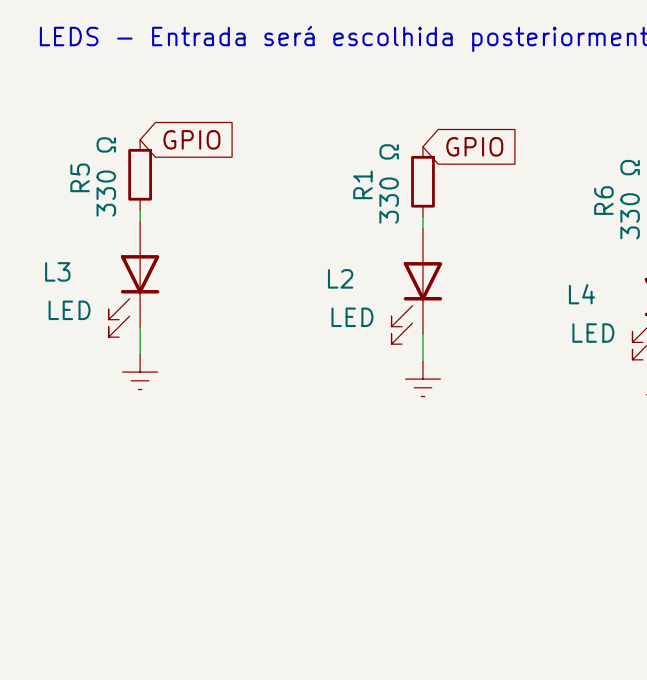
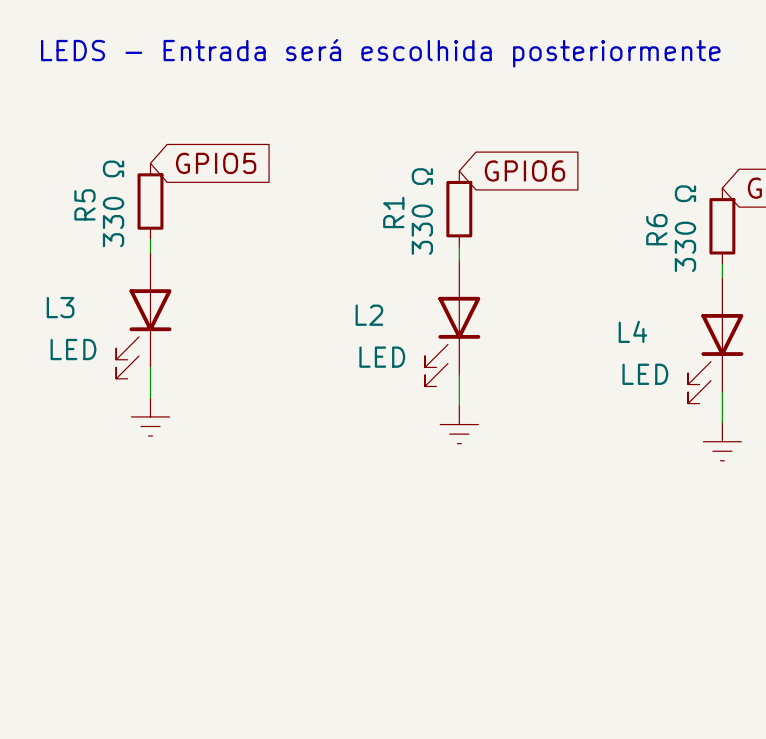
global label: GPIO (191, 139) -> GPIO5 (216, 163)
global label: GPIO (474, 146) -> GPIO6 (524, 171)

